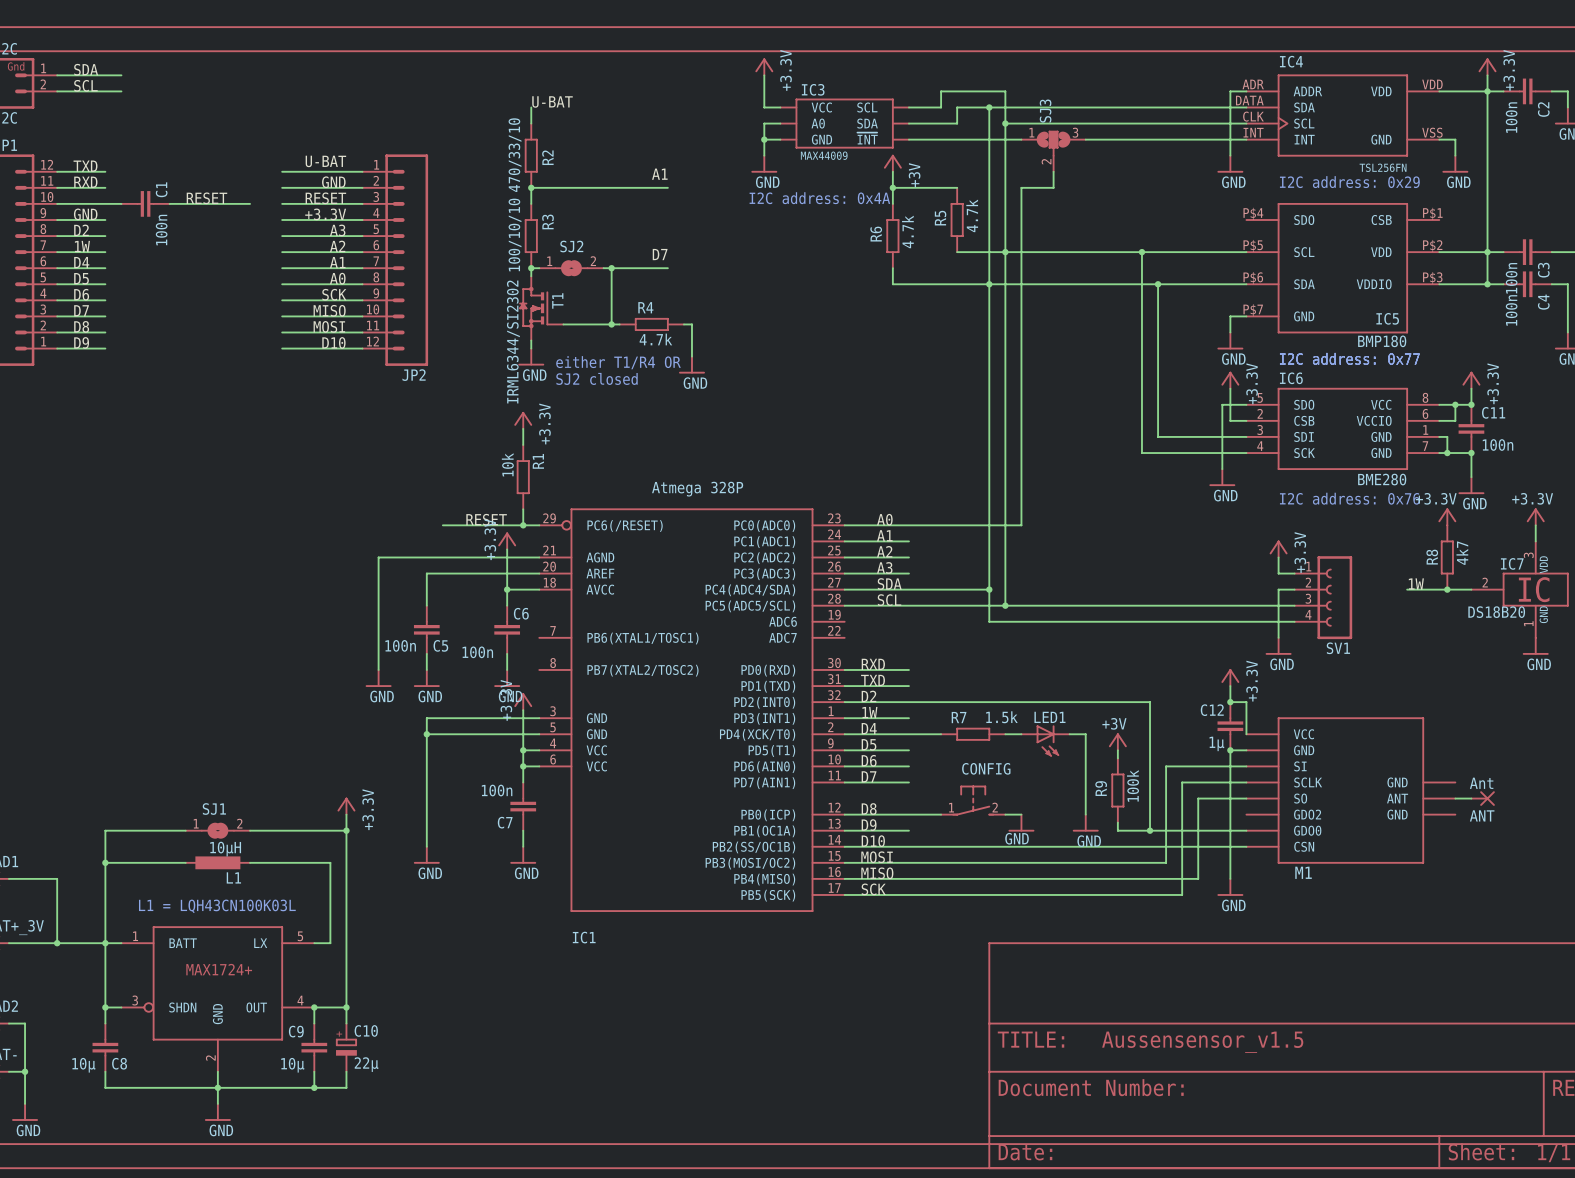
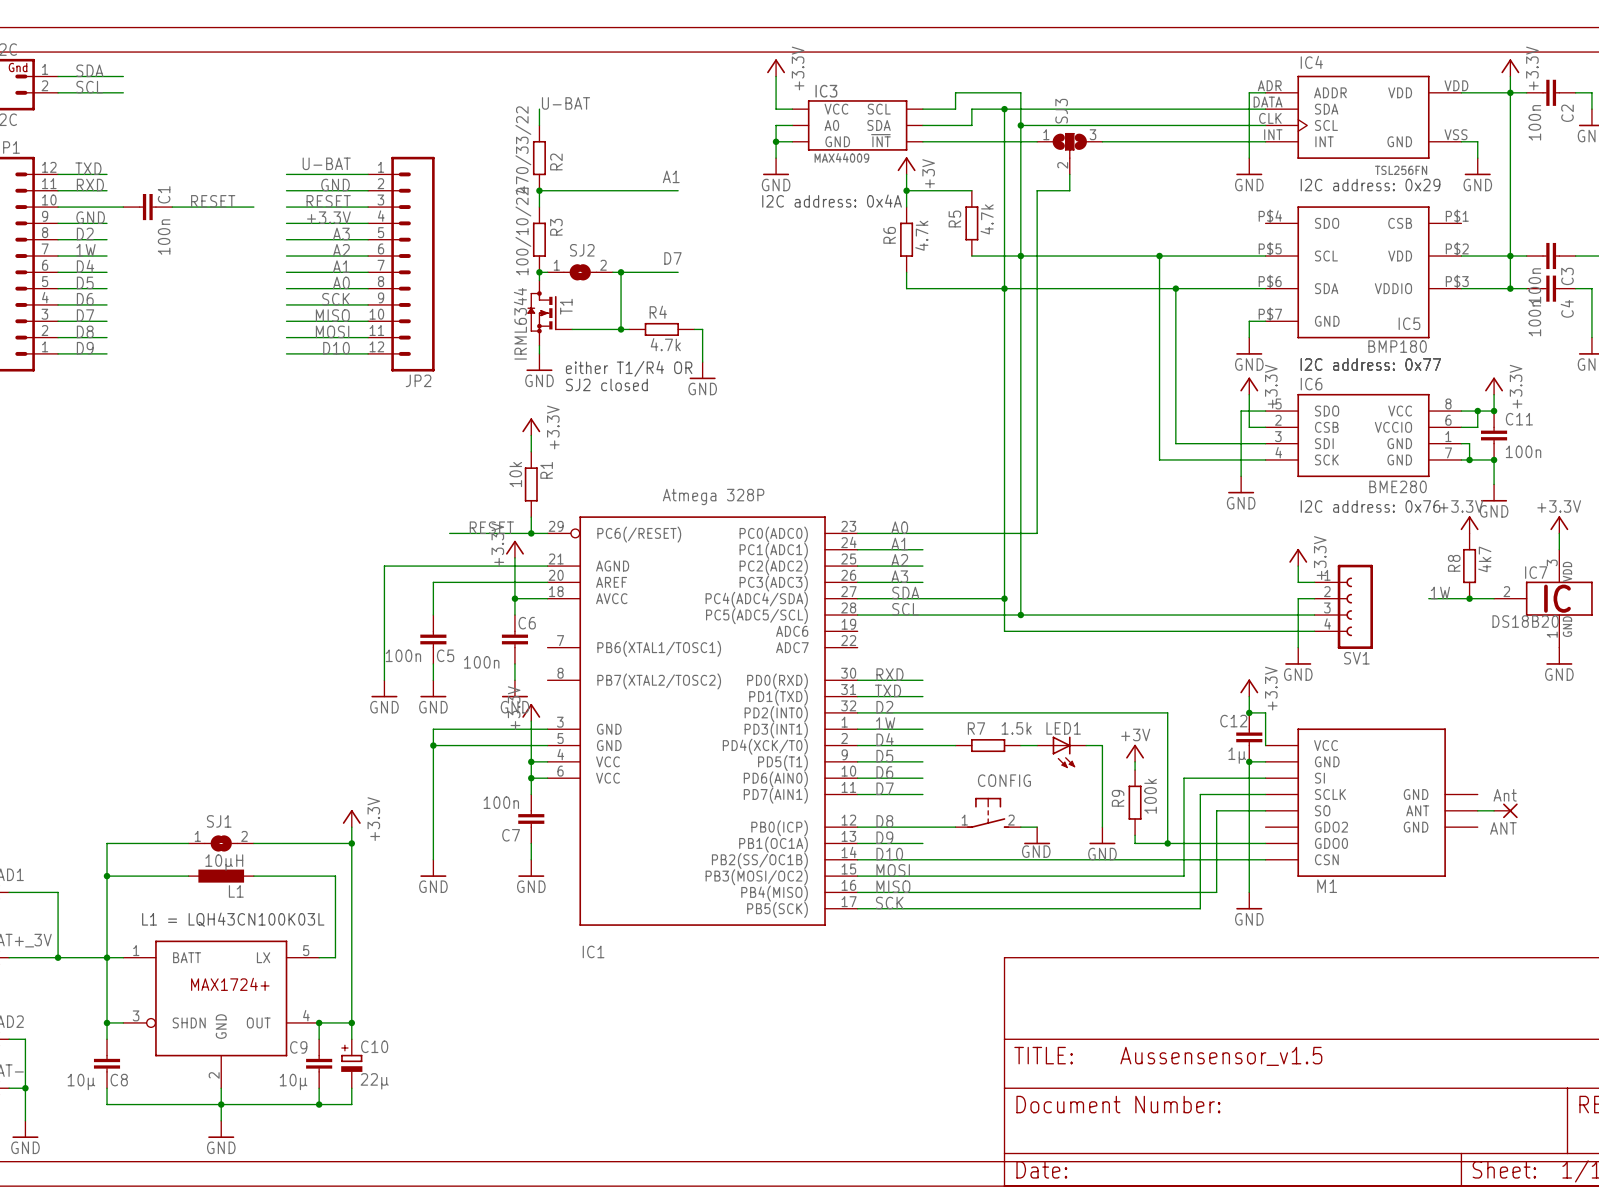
R2 value: 470/33/10 (515, 155) -> 470/33/22 (523, 149)
R3 value: 100/10/10 (515, 235) -> 100/10/22 (523, 231)
T1 value: IRML6344/SI2302 (513, 342) -> IRML6344 (520, 323)

